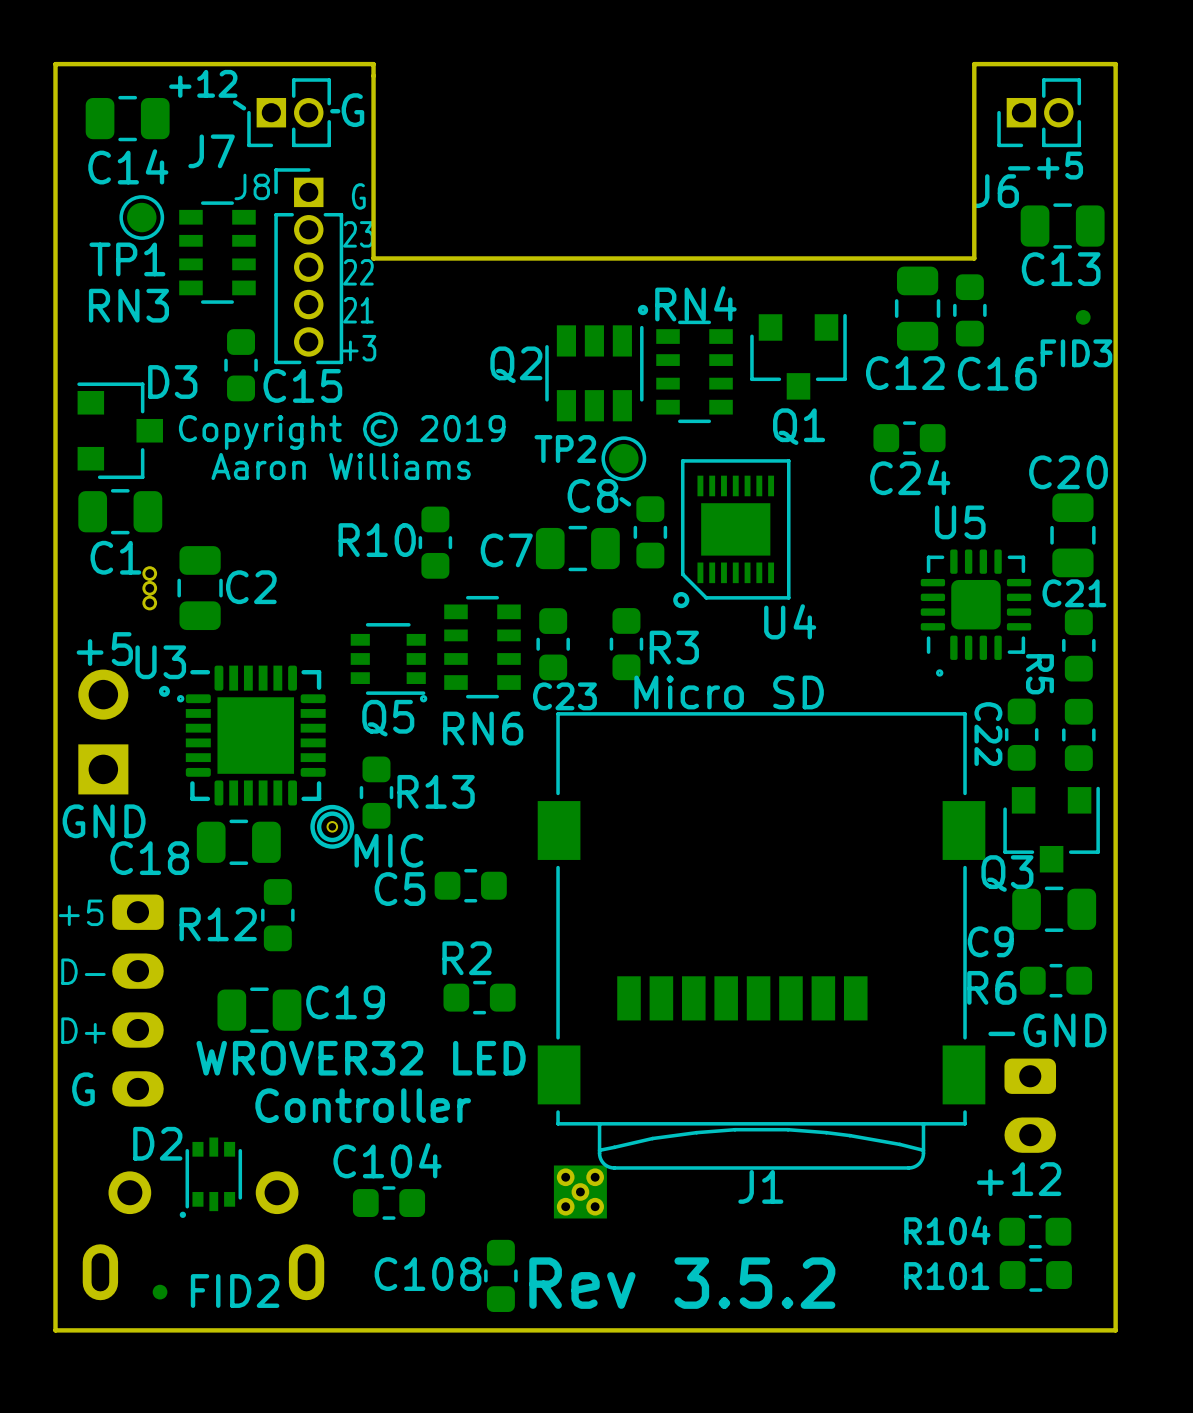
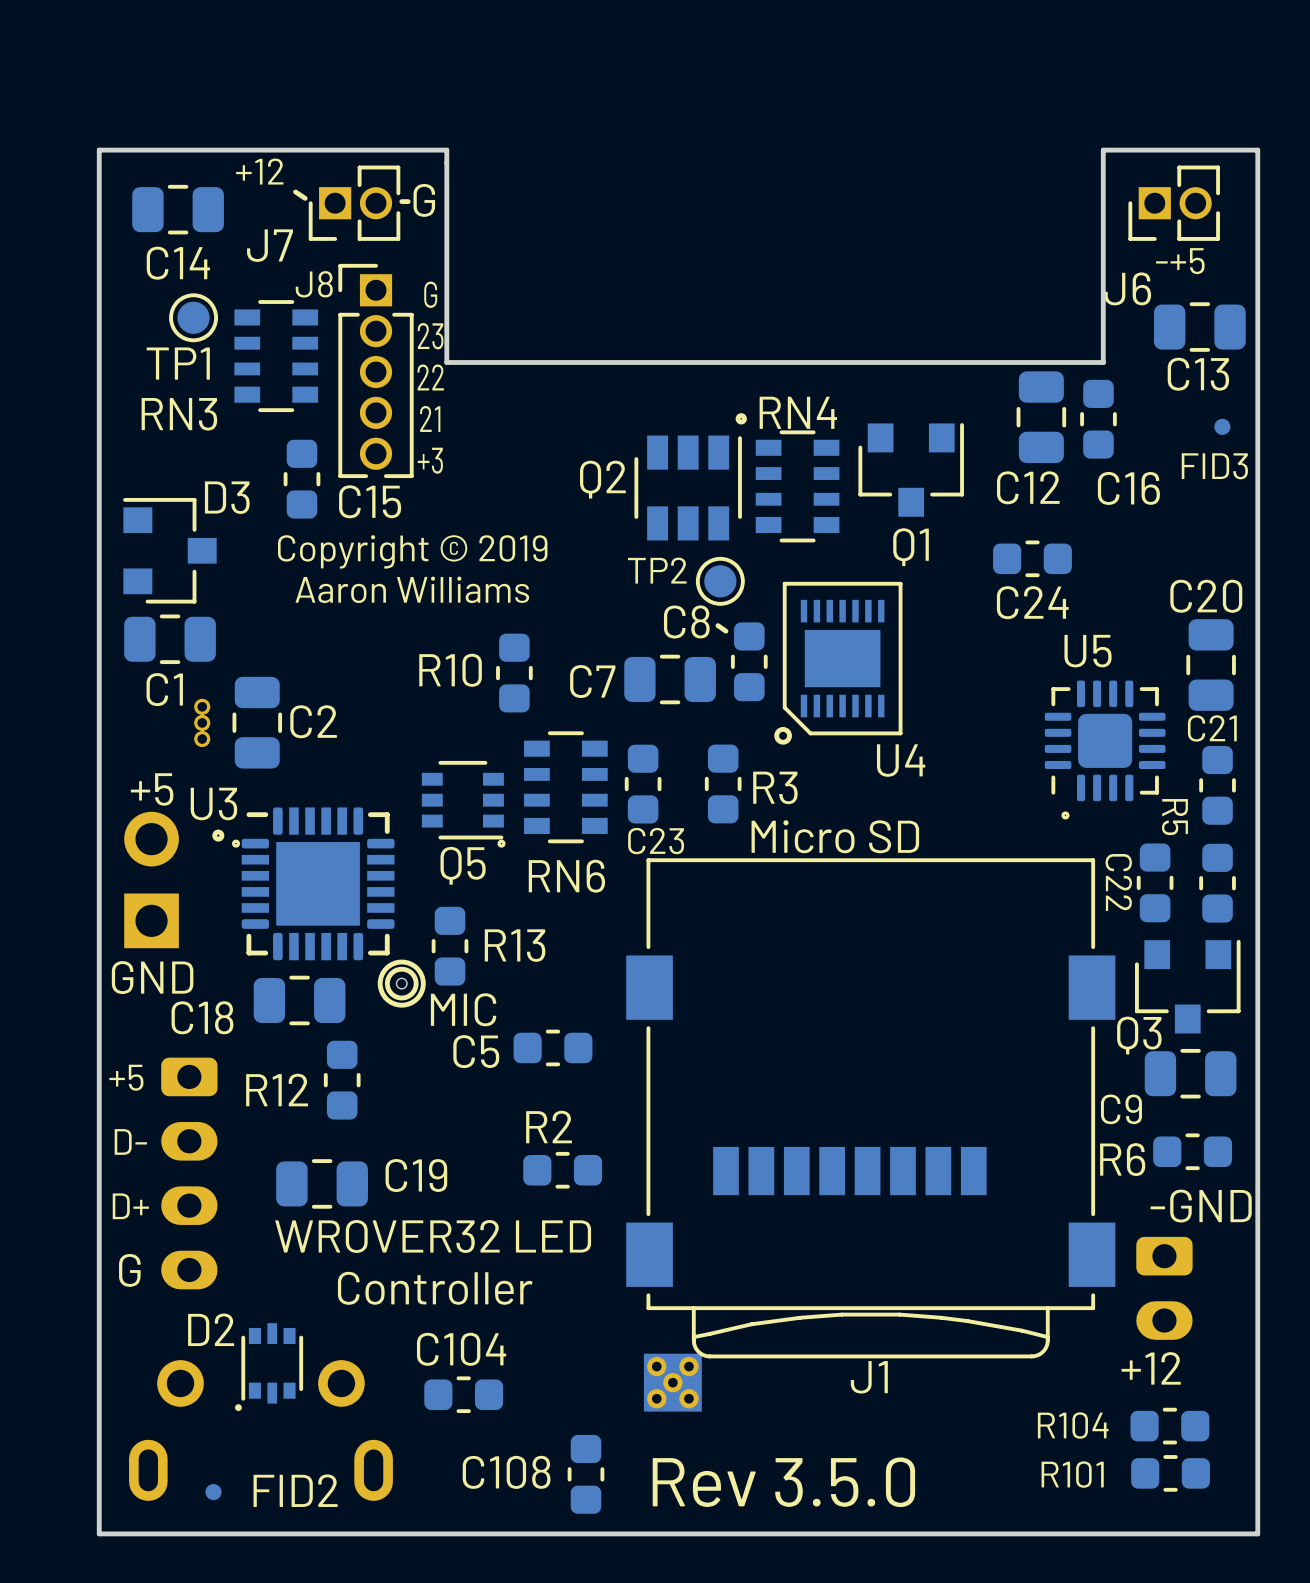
text: Rev 3.5.2 (682, 1283) -> Rev 3.5.0 (783, 1482)

